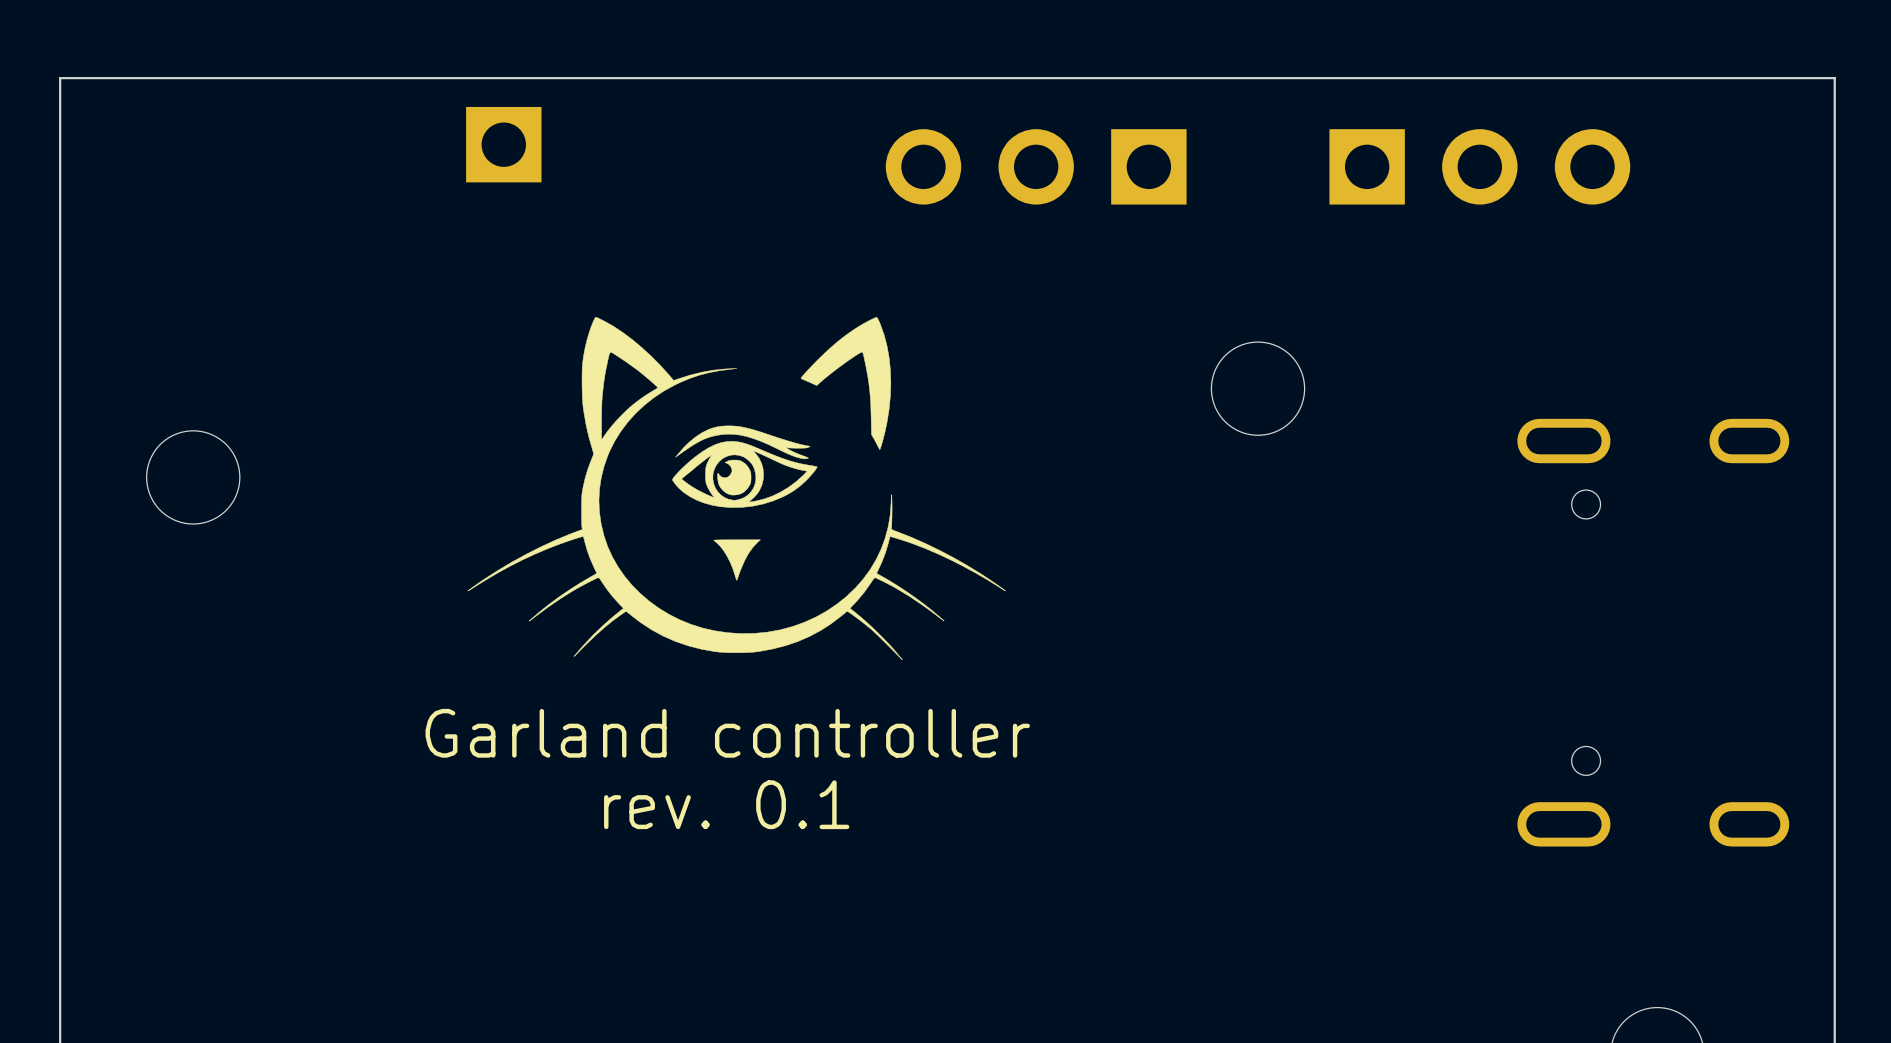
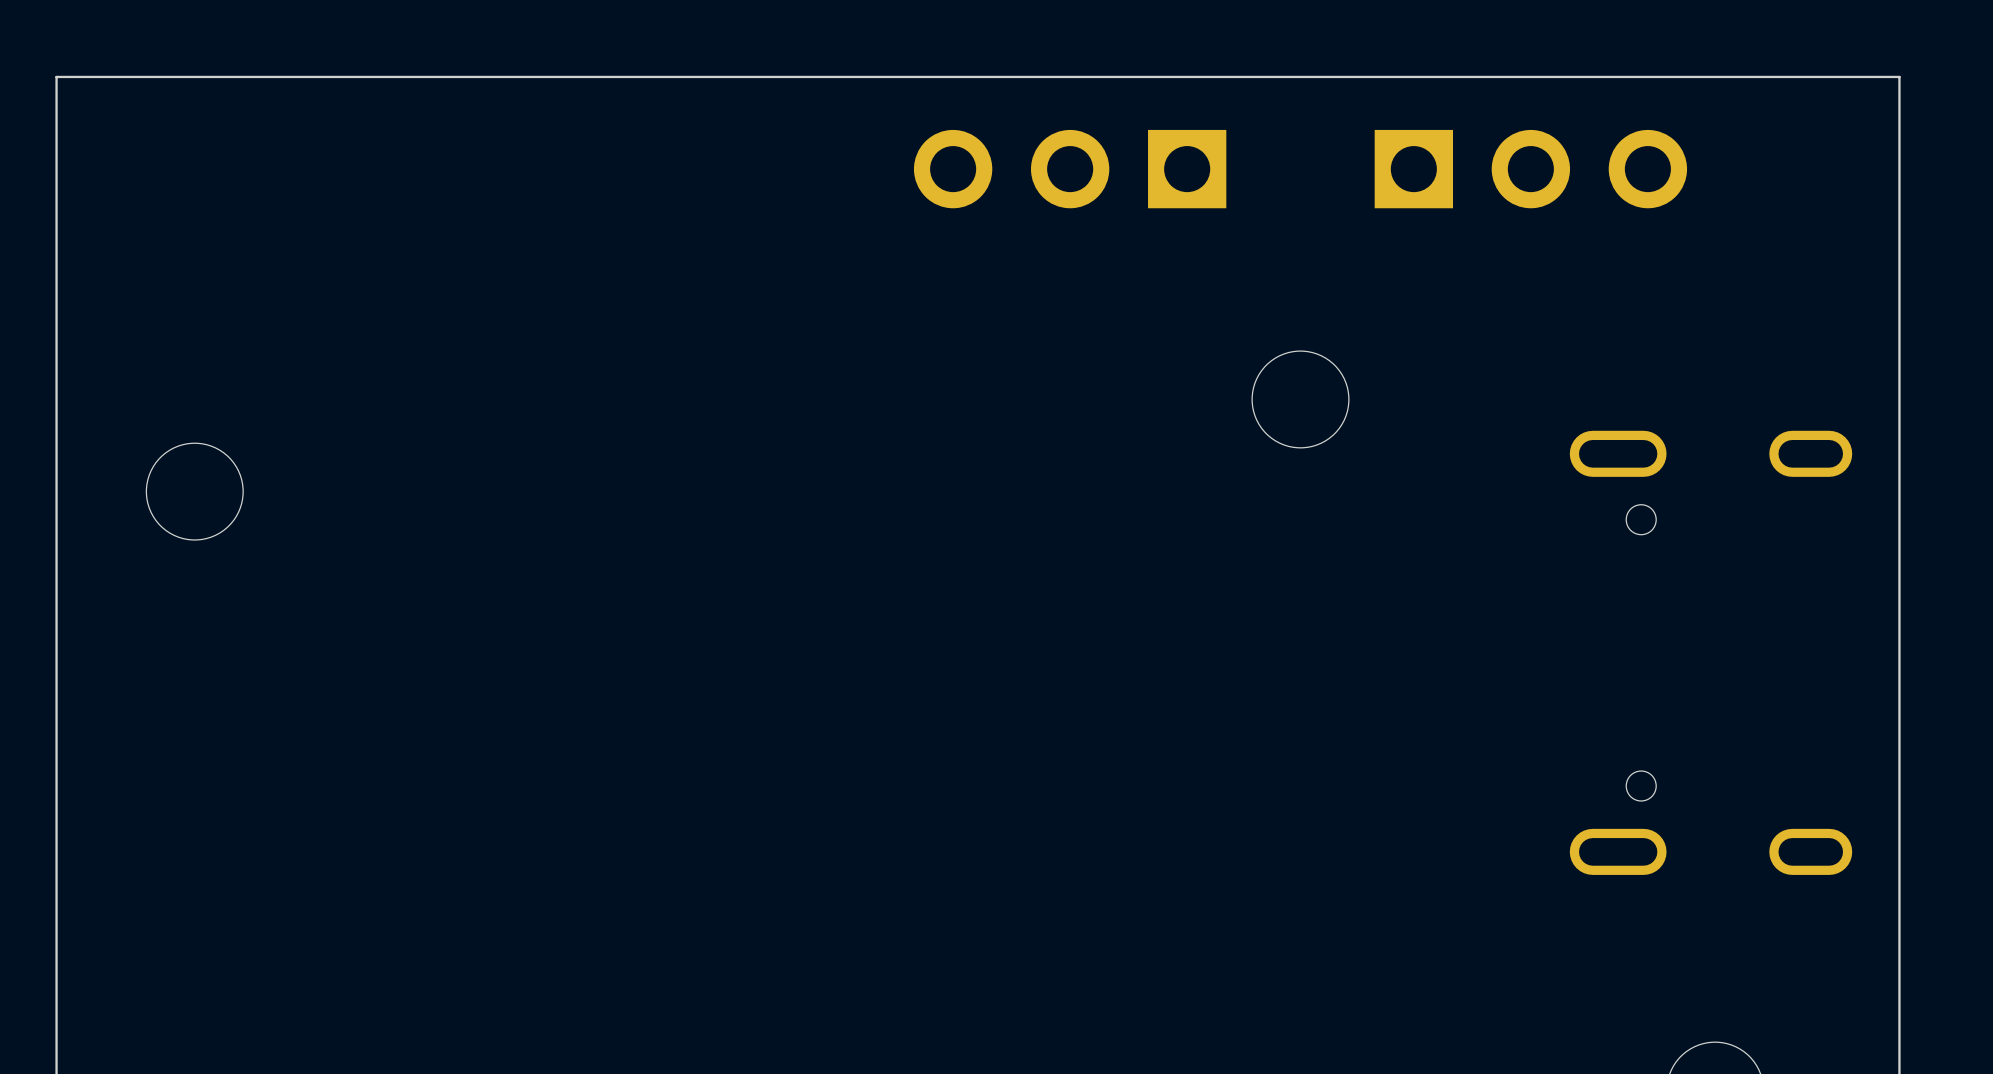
part: (503, 144) -> none
drawing: [467, 316, 1006, 660] -> none
text: Garland controller (727, 733) -> none
text: rev. 0.1 (726, 804) -> none

